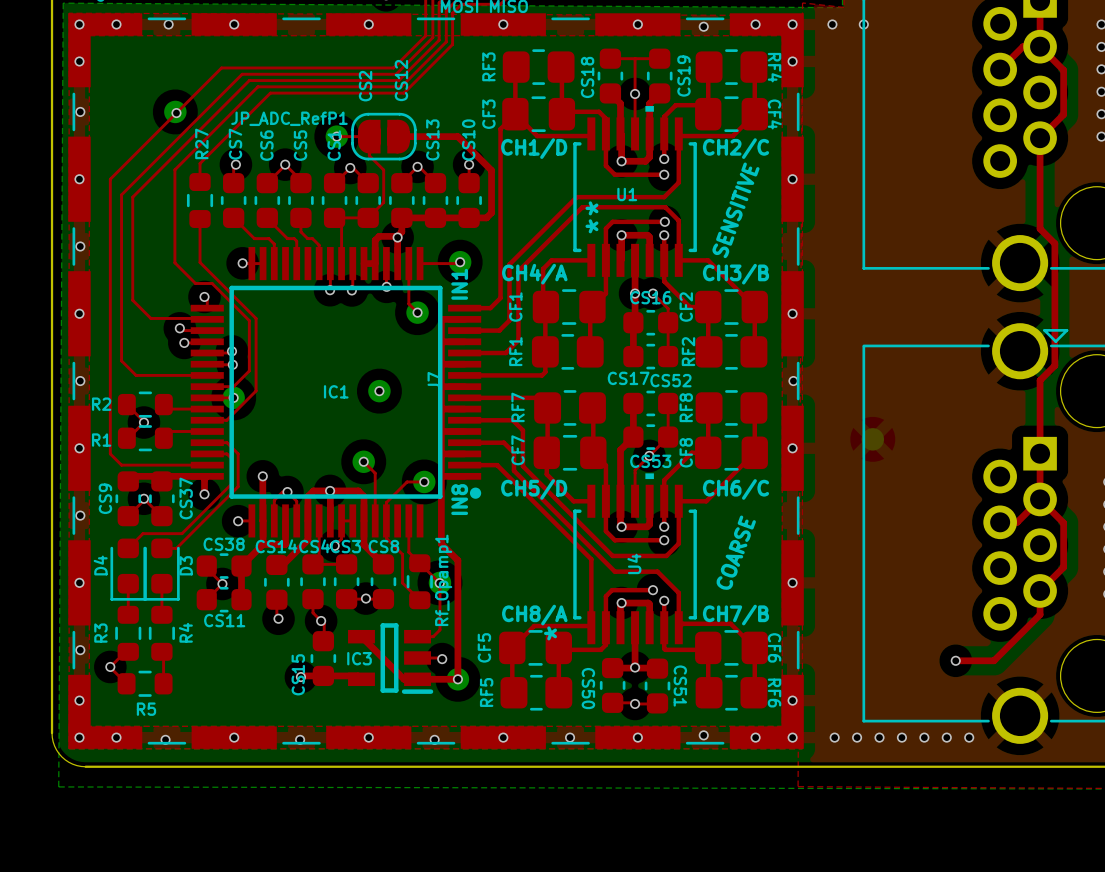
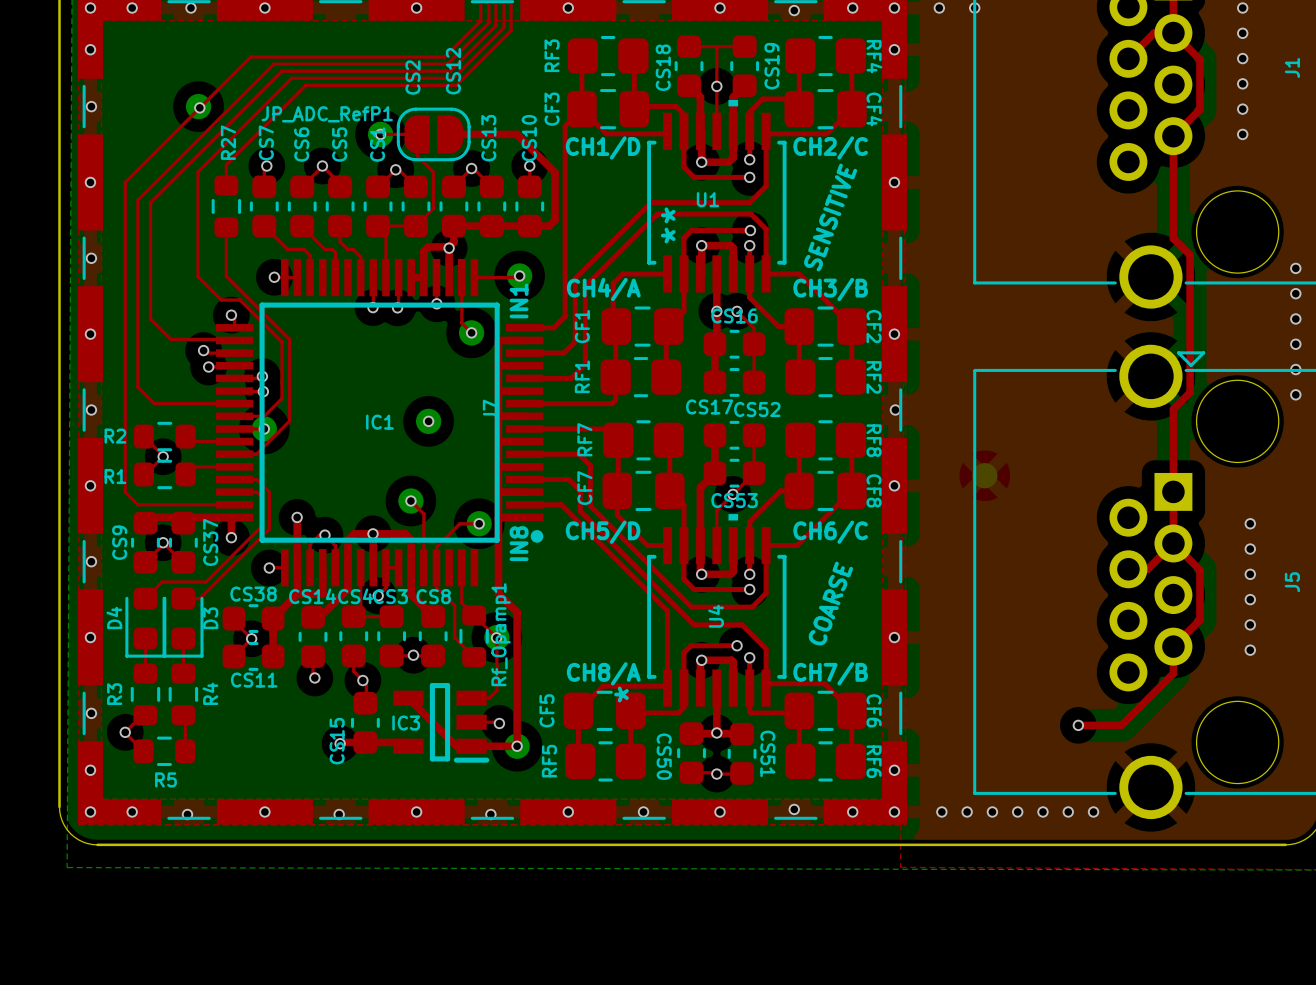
CF2 name rotation: 0° (686, 307) -> 180° (874, 326)
CF2 name position: CF2 (686, 307) -> CF2 (874, 326)
RF2 name rotation: 0° (688, 351) -> 180° (874, 377)
RF2 name position: RF2 (688, 351) -> RF2 (874, 377)
RF8 name rotation: 0° (686, 407) -> 180° (874, 440)
RF8 name position: RF8 (686, 407) -> RF8 (874, 440)
CF8 name rotation: 0° (686, 452) -> 180° (874, 490)
CF8 name position: CF8 (686, 452) -> CF8 (874, 490)

